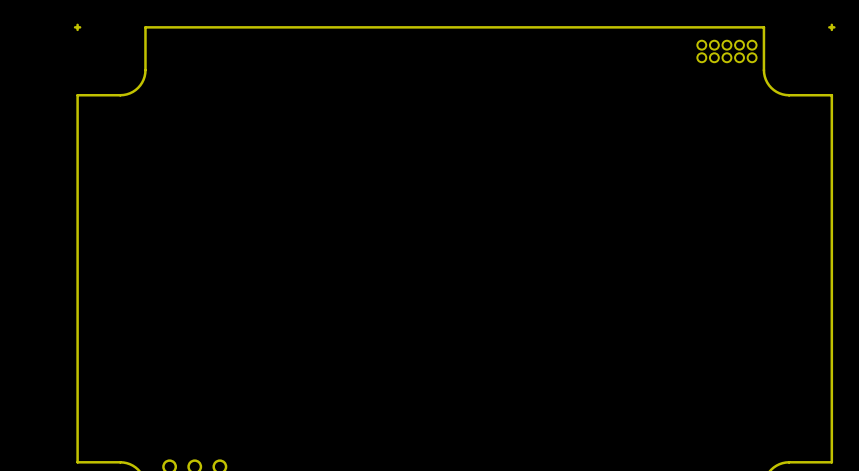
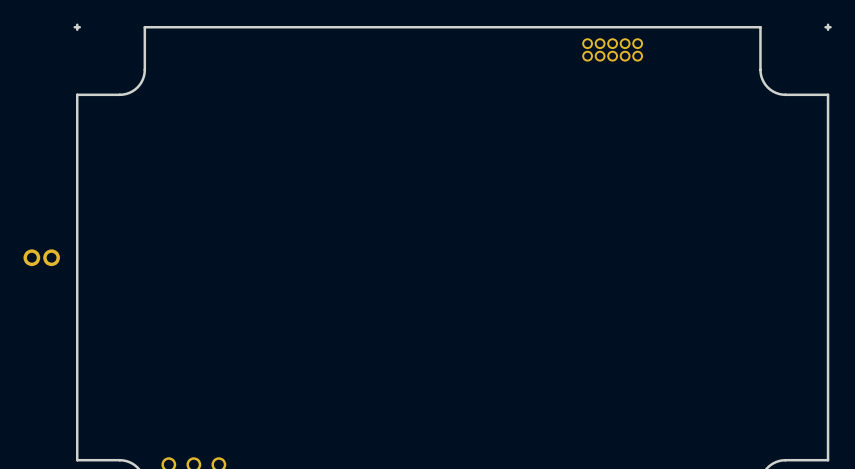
part position: (726, 51) -> (612, 49)
part: none -> (41, 257)

